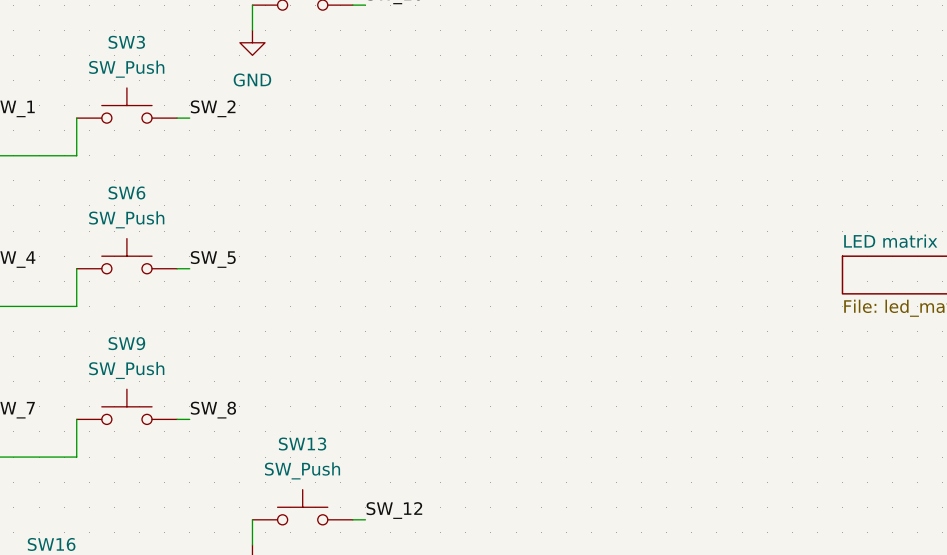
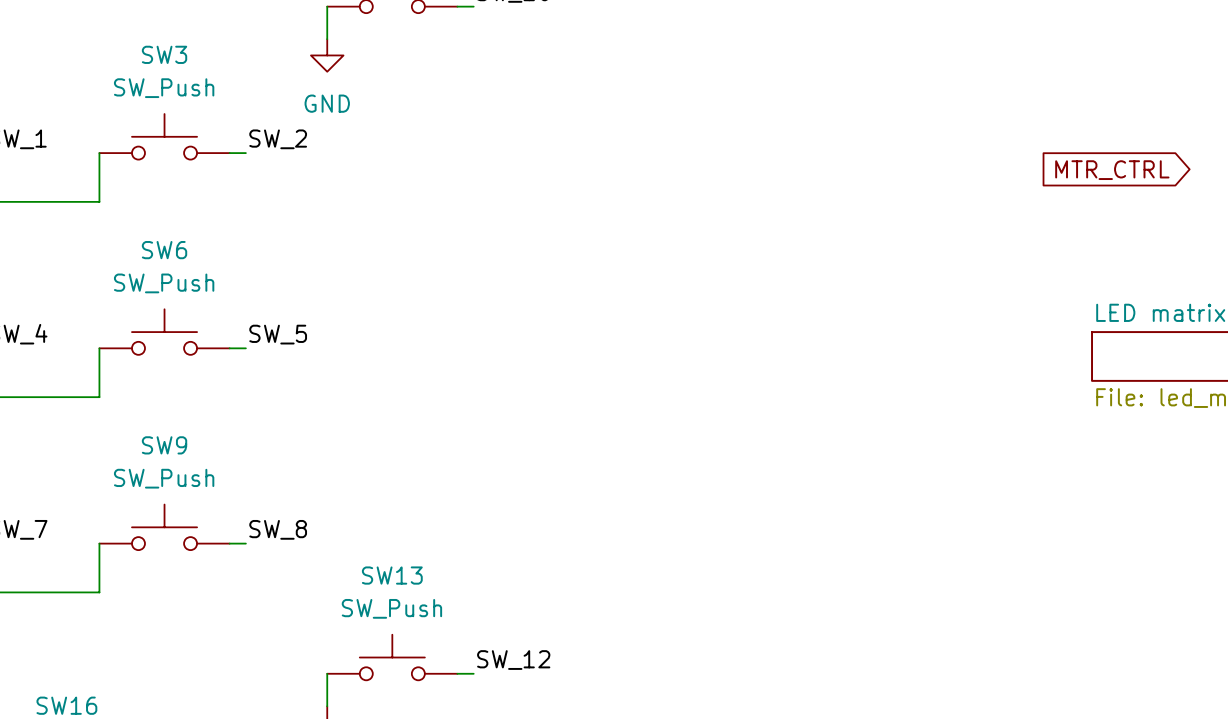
global label: none -> MTR_CTRL (1112, 170)

